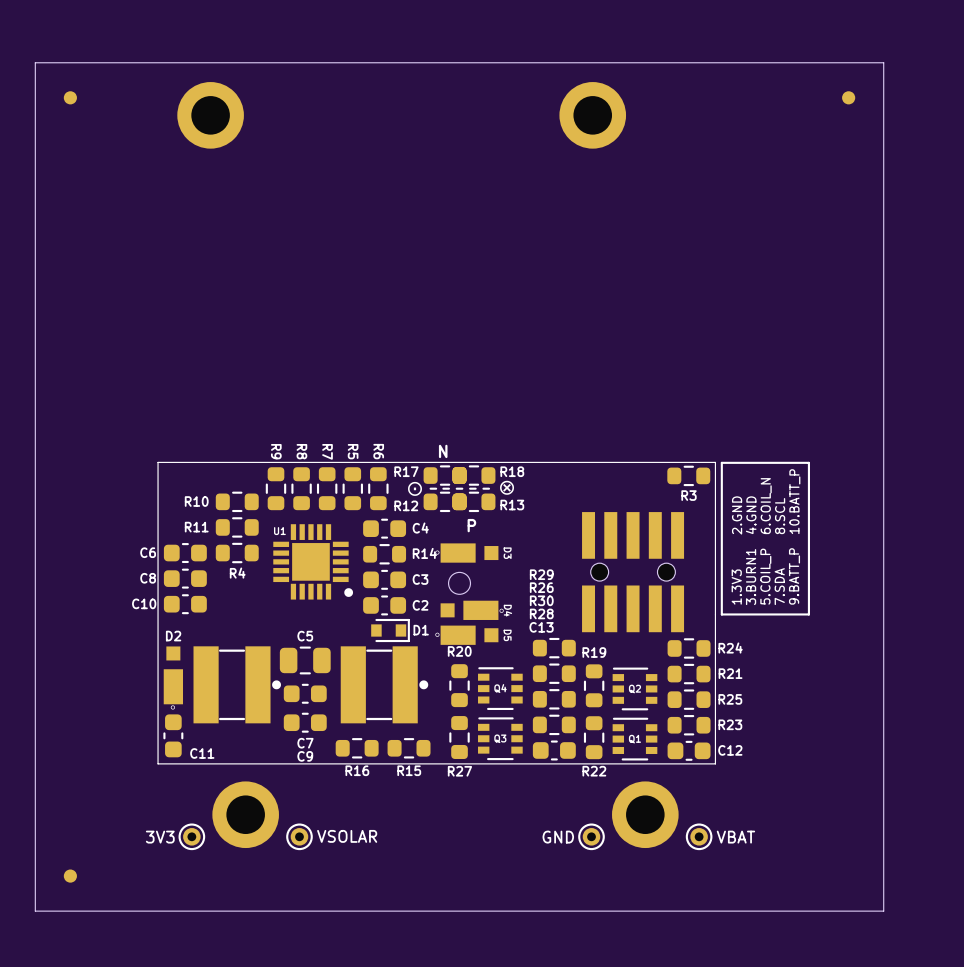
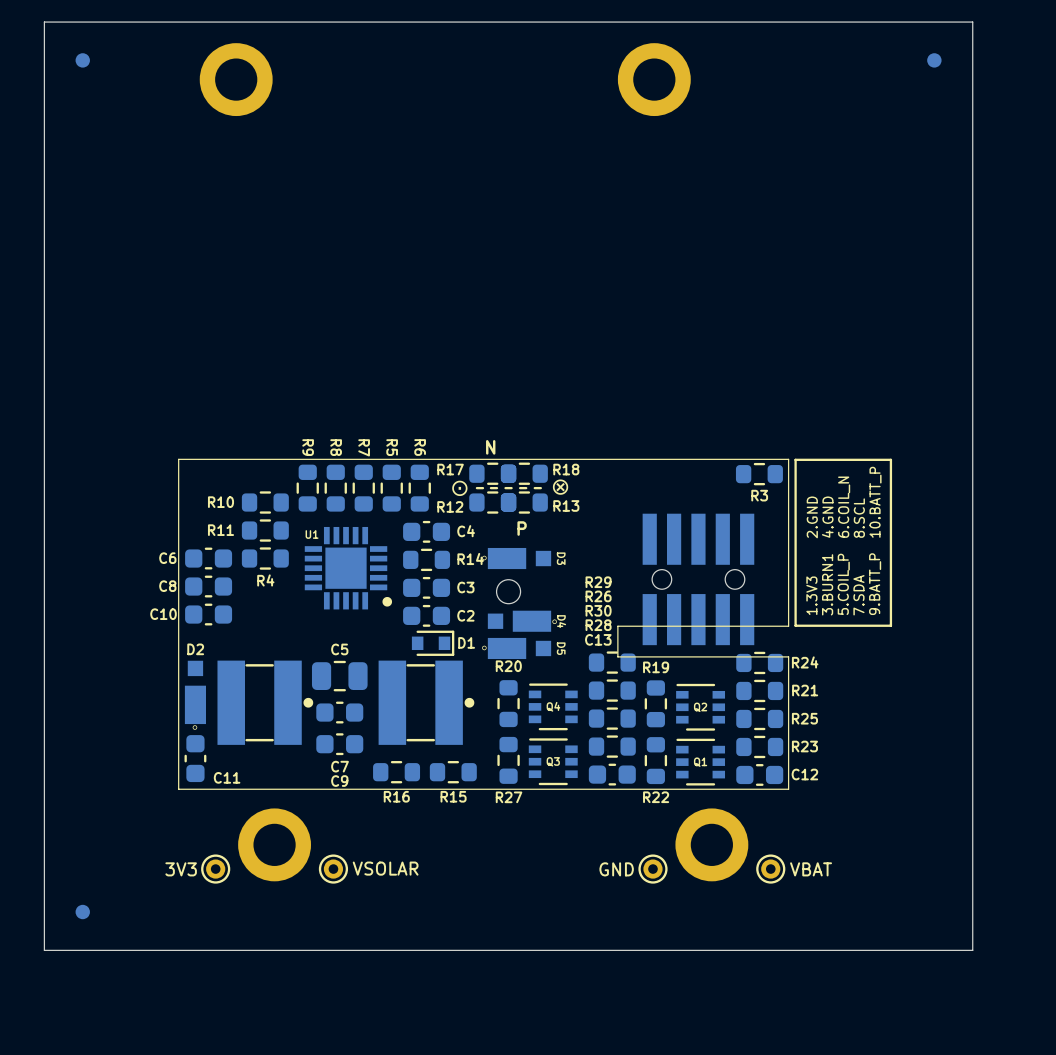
line: (715, 614) (715, 642) -> (788, 626) (617, 626) (617, 656) (788, 656)

